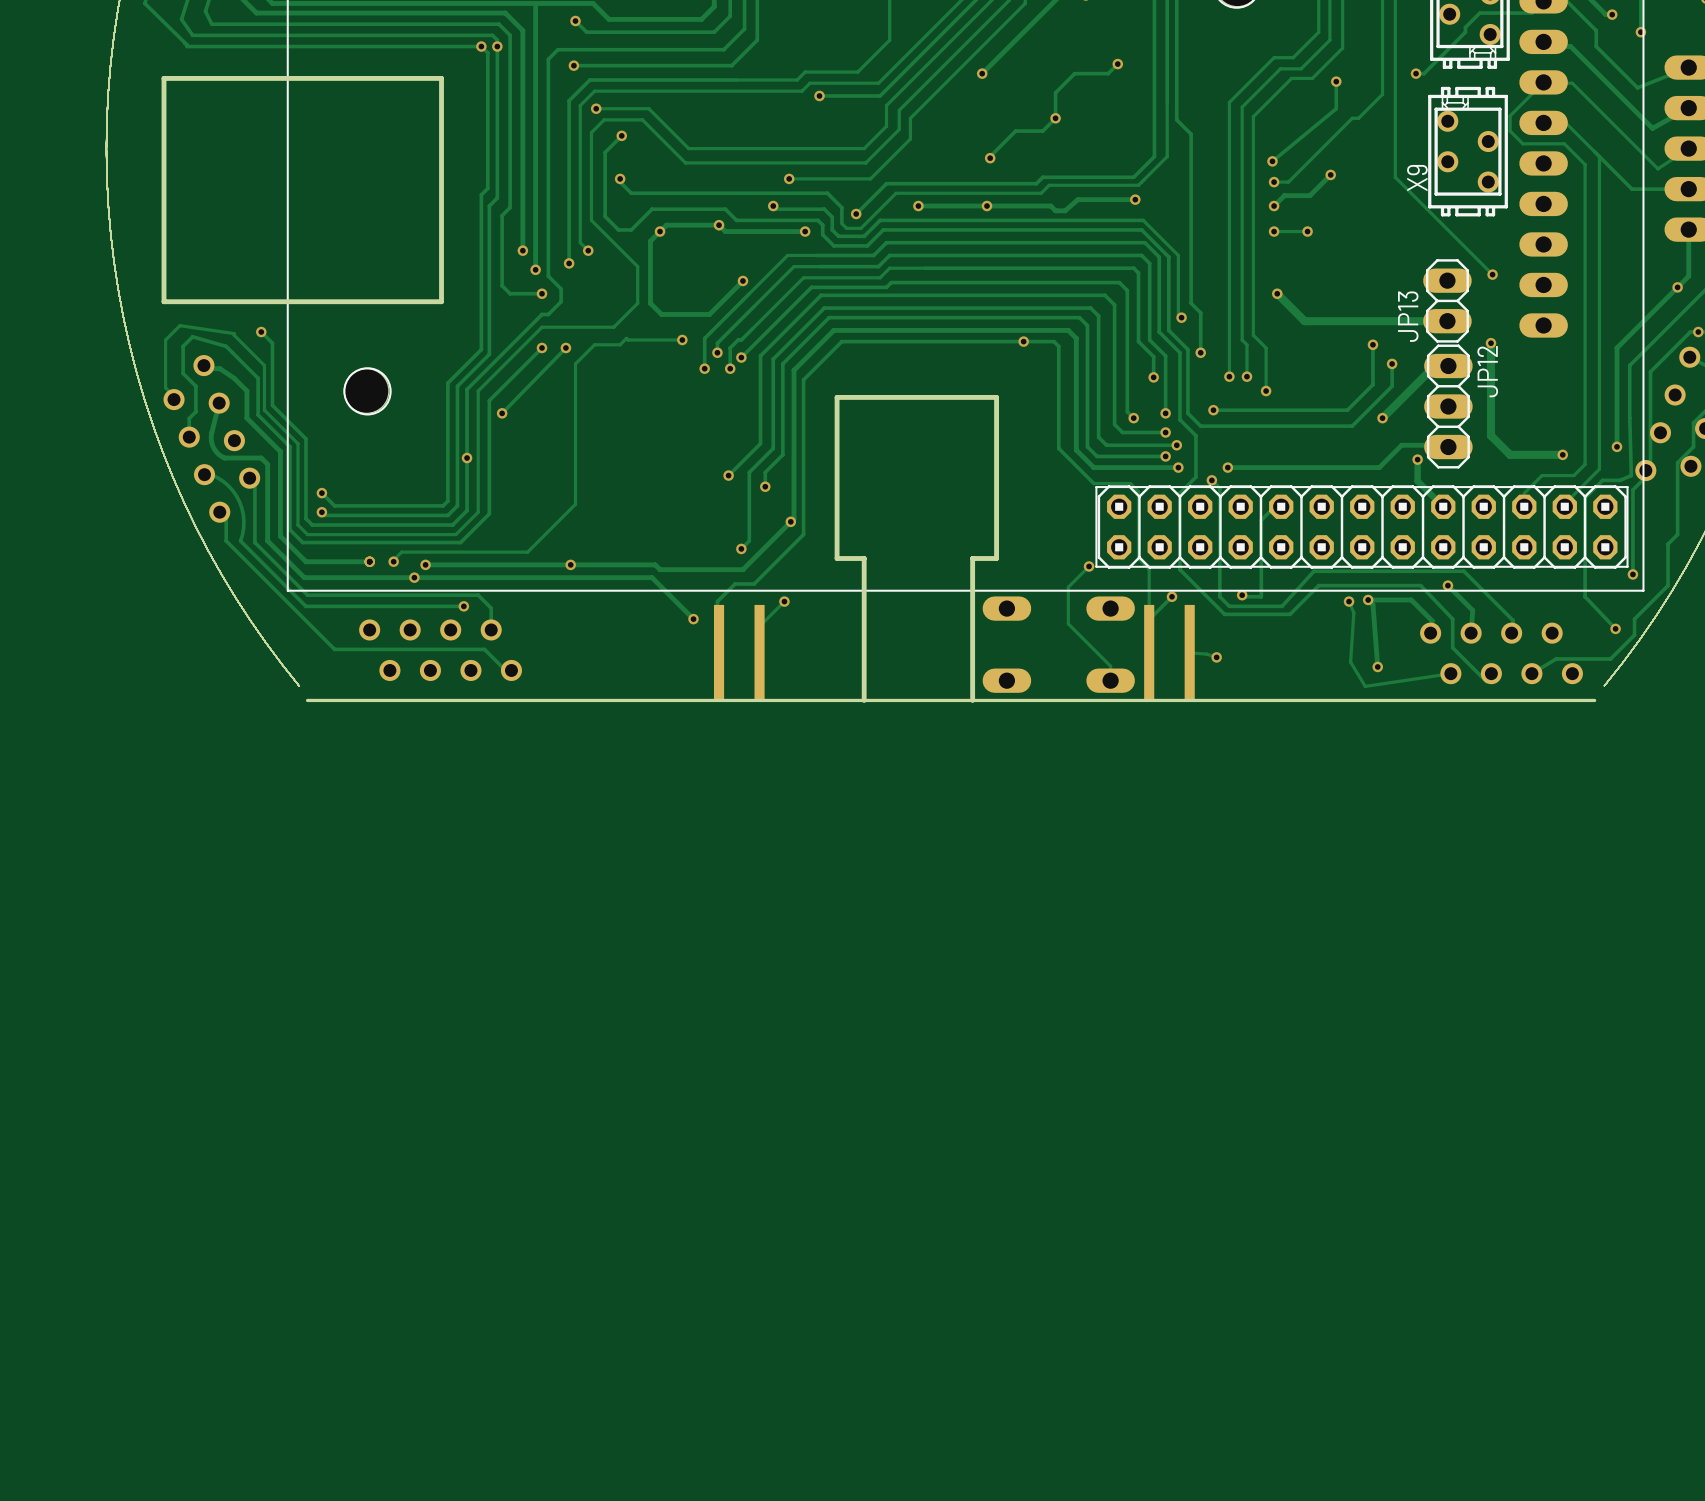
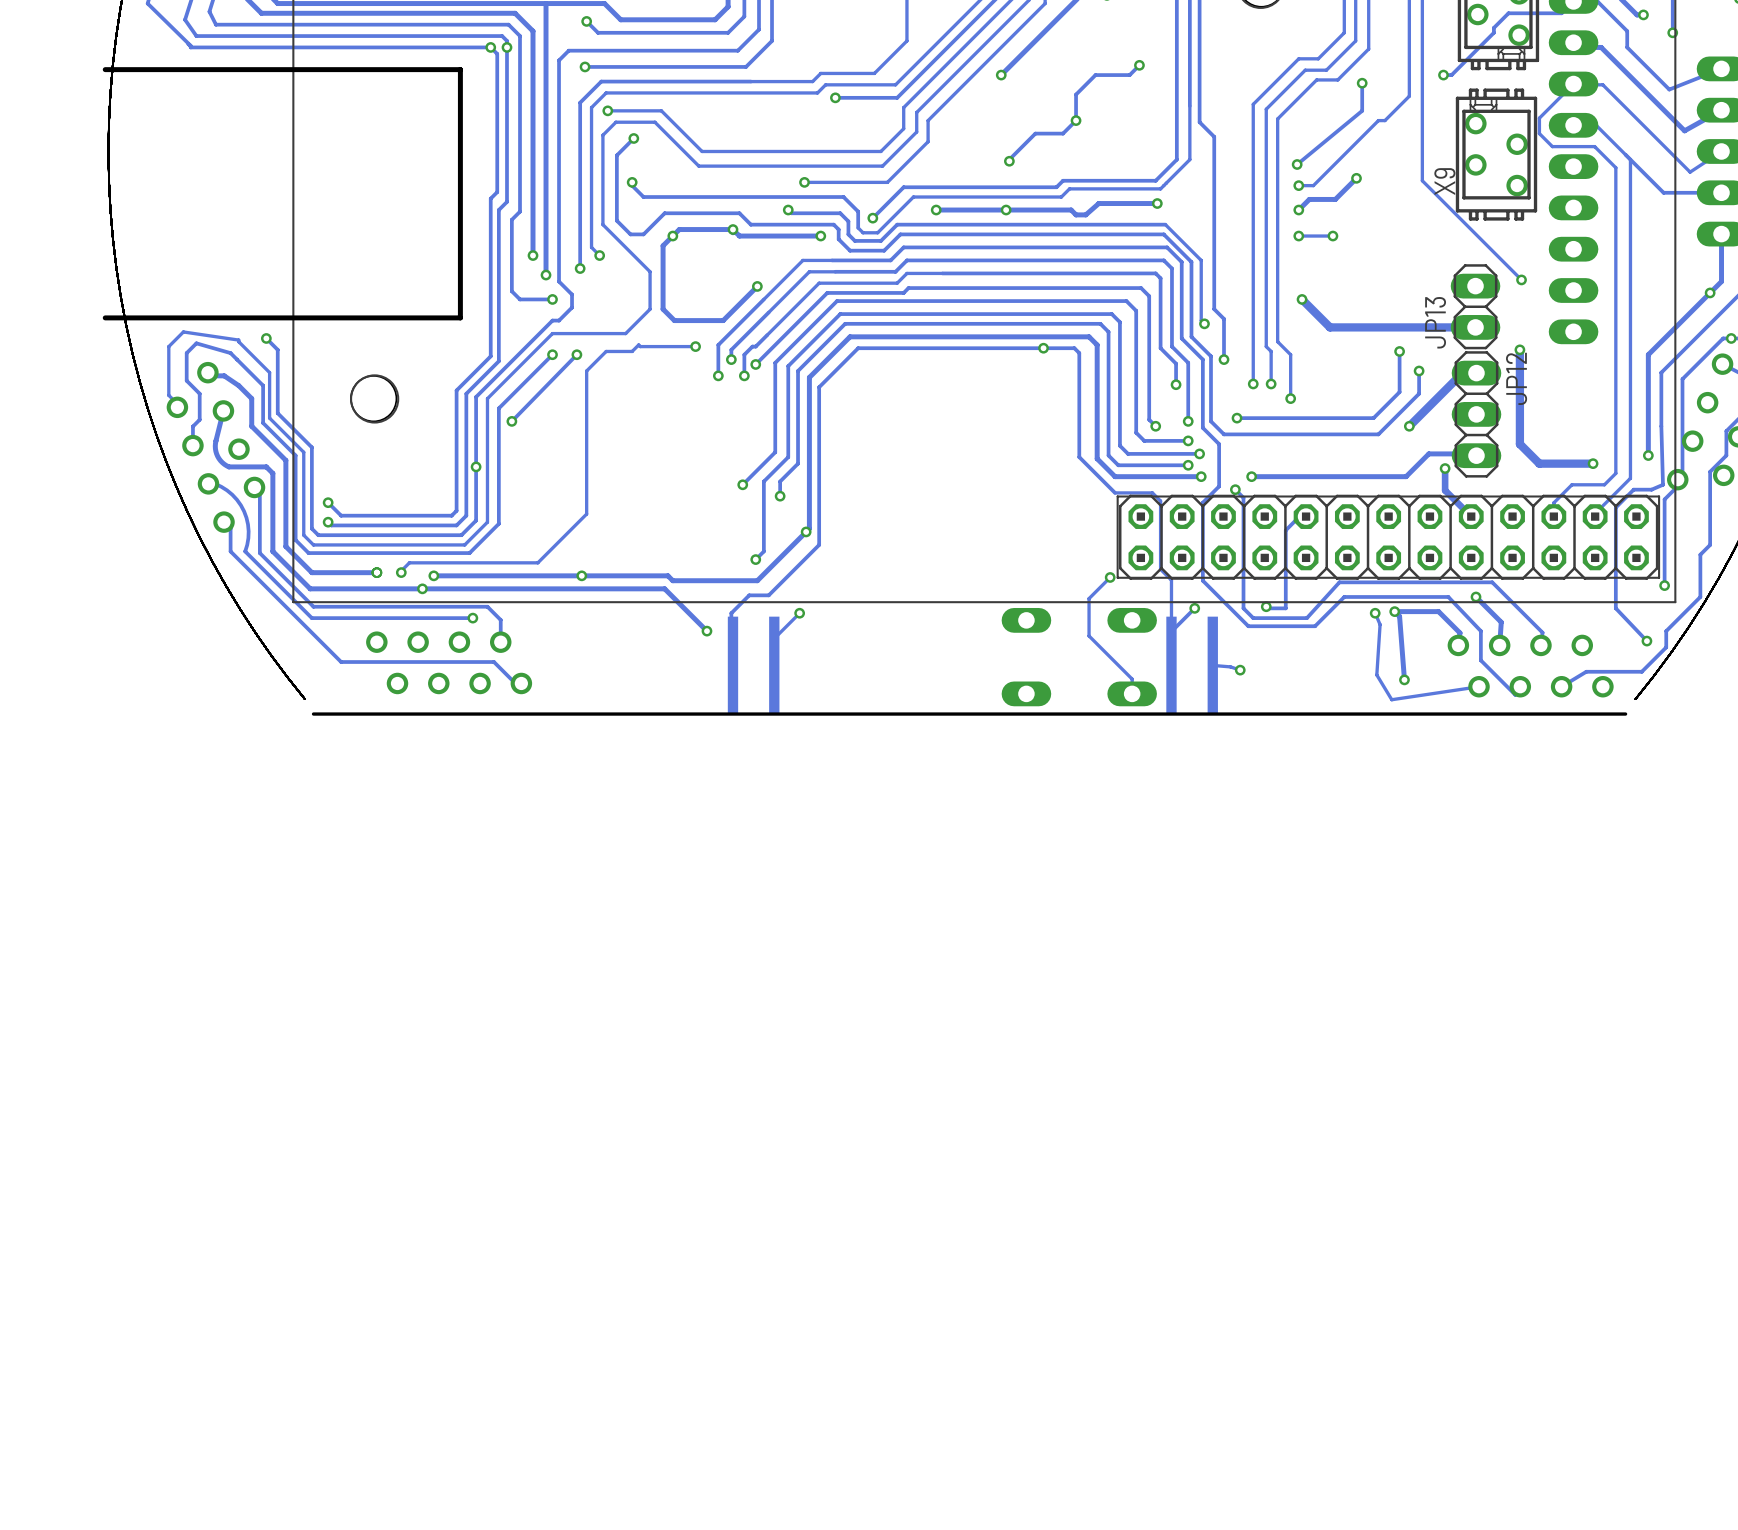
board edge: none -> (105, 69) (460, 69) (460, 317) (105, 317)
board edge: (441, 78) (164, 78) (164, 301) (441, 301) (441, 78) -> none
board edge: (972, 700) (972, 558) (996, 558) (996, 397) (837, 397) (837, 558) (864, 558) (864, 700) -> none

